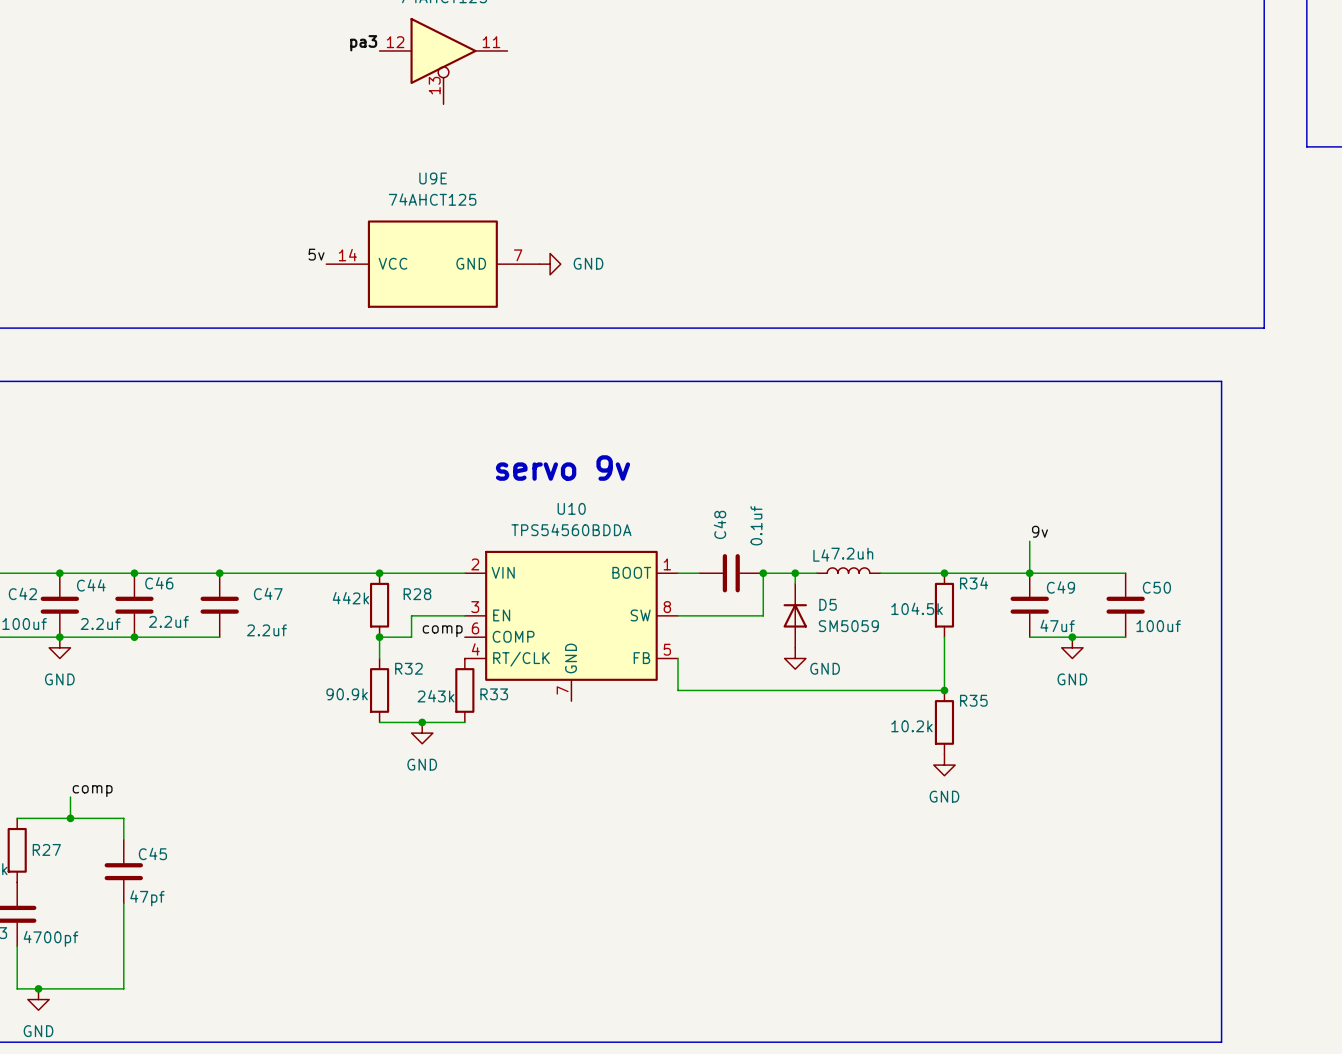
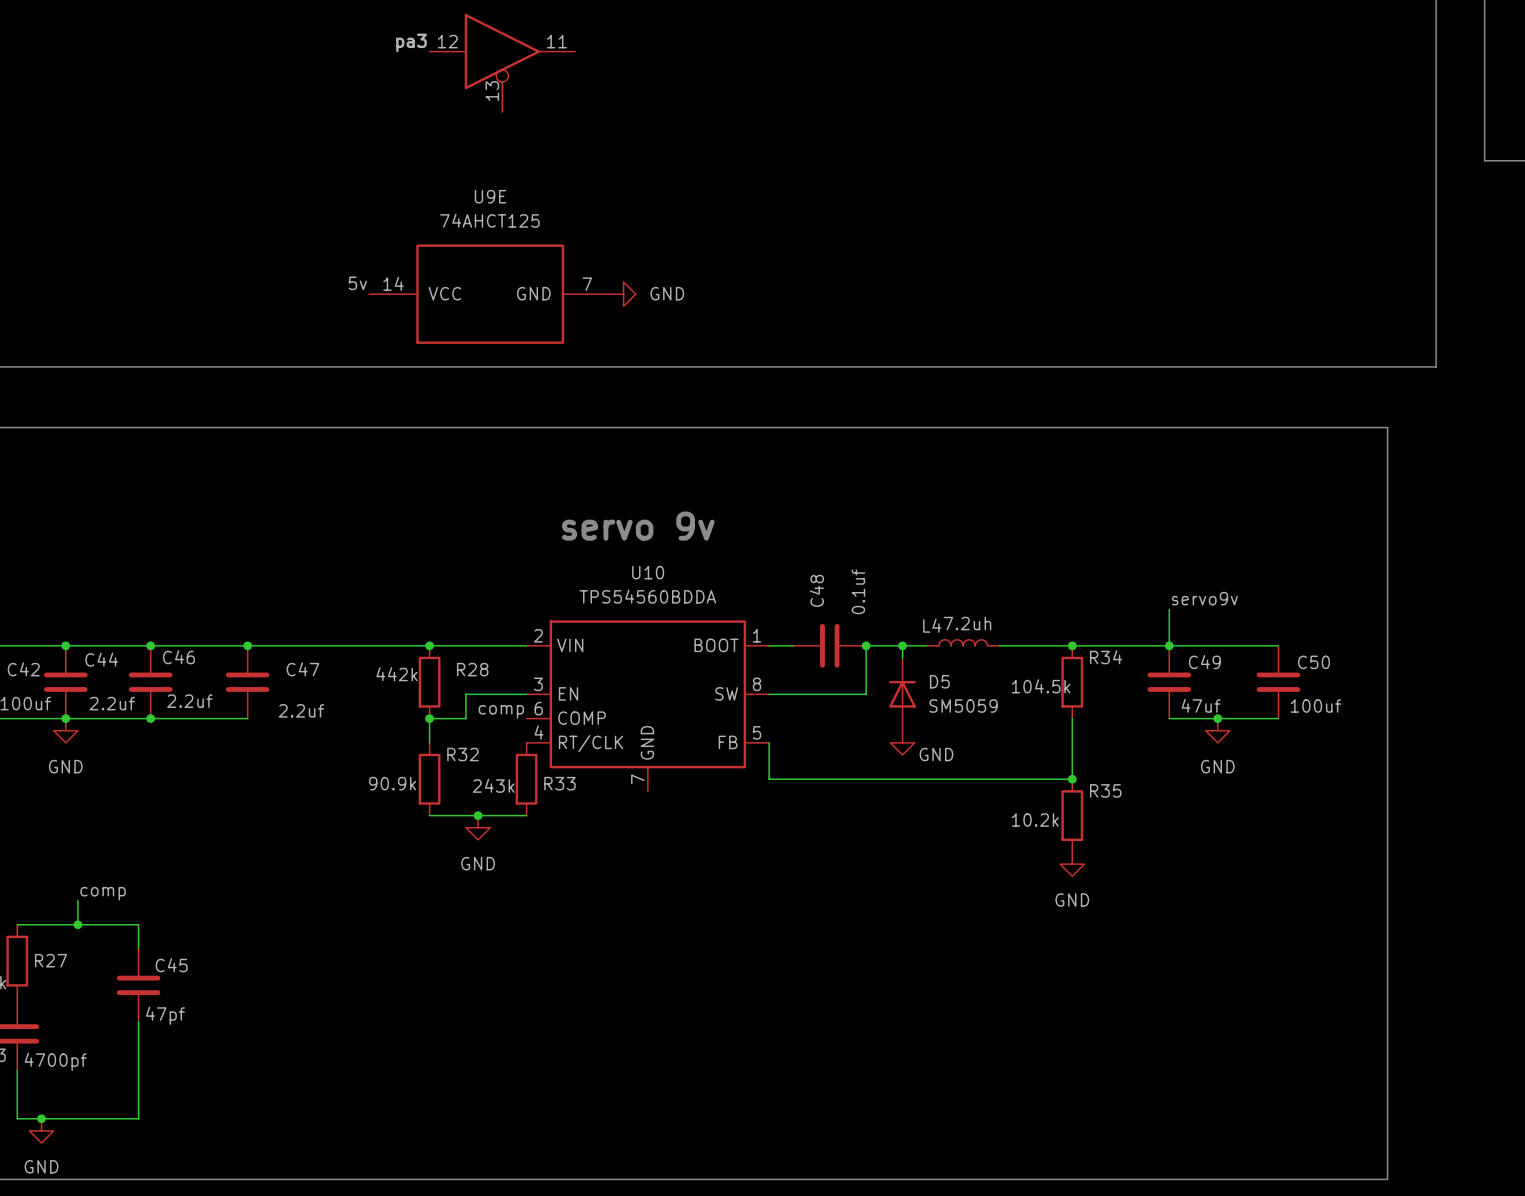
label: 9v (1039, 531) -> servo9v (1204, 598)

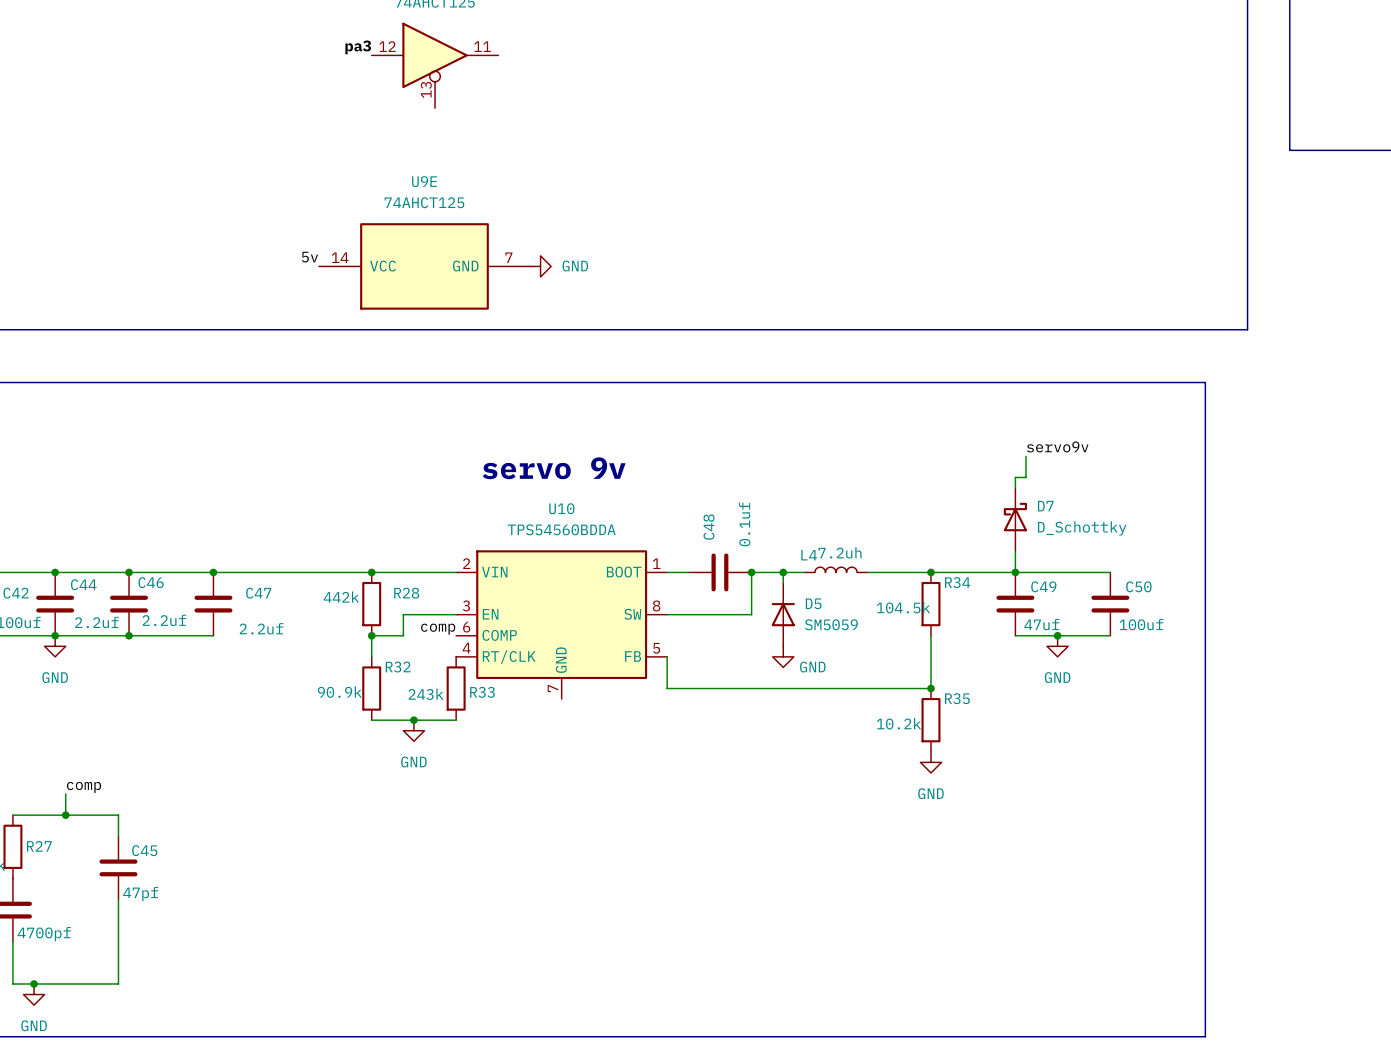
wire: none -> (1025, 456) (1025, 477) (1015, 477) (1015, 488)
D7: none -> D_Schottky (1015, 519)
label position: servo9v (1204, 598) -> servo9v (1057, 446)

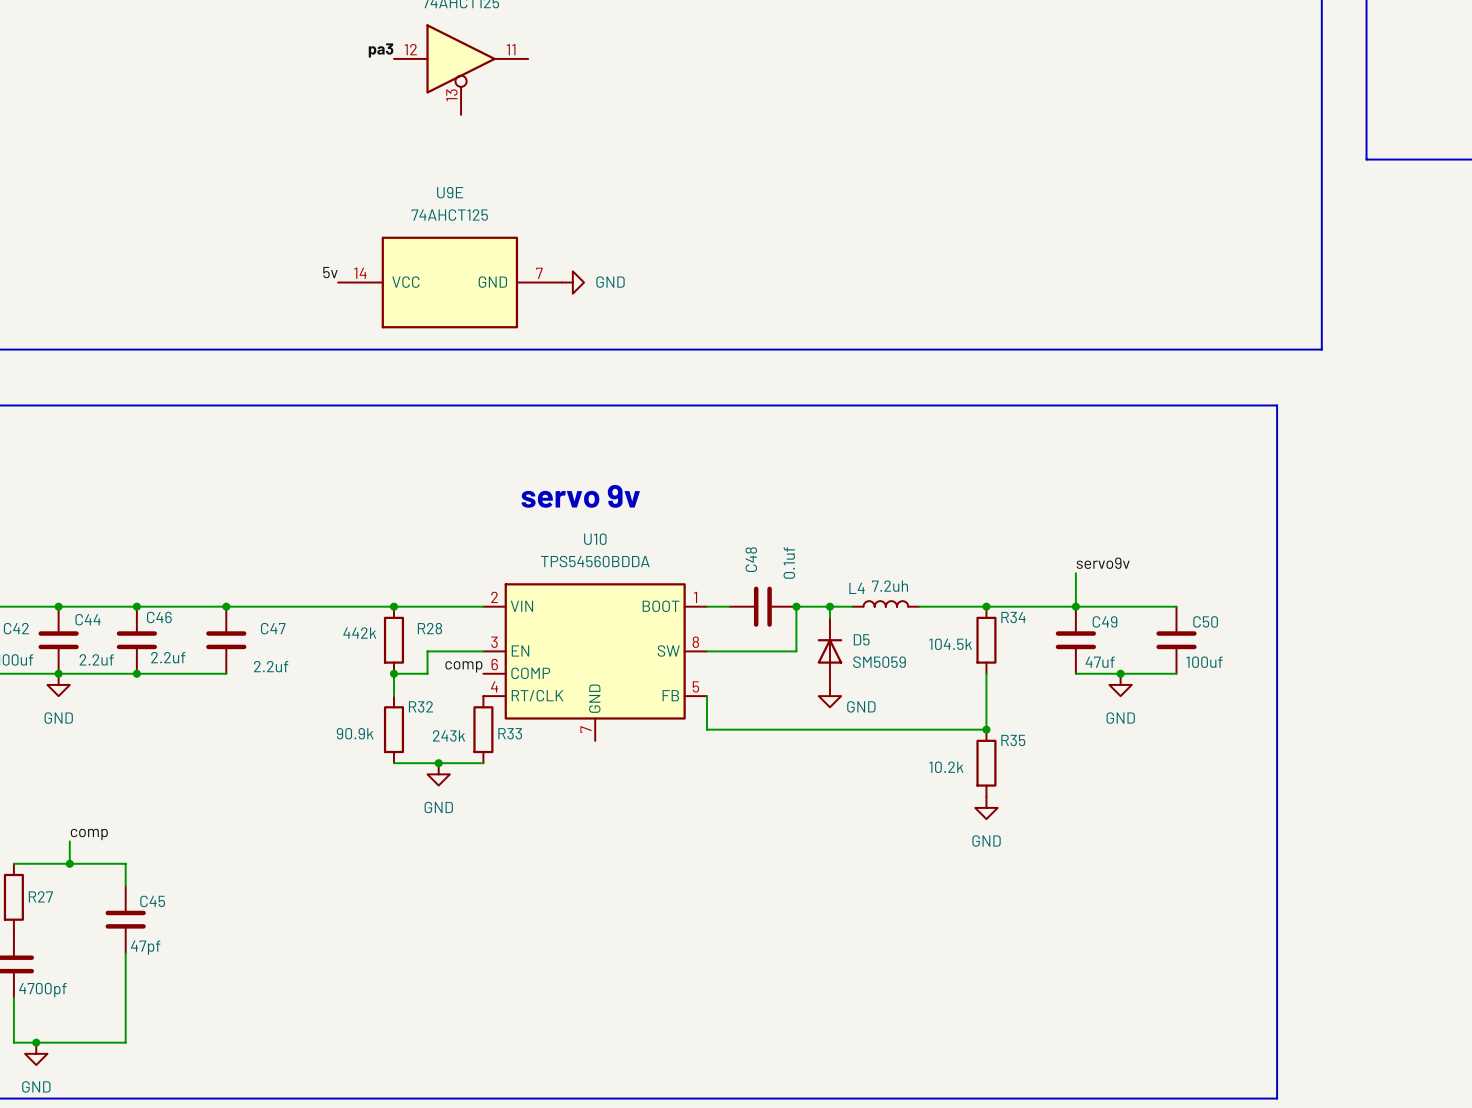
label position: servo9v (1057, 446) -> servo9v (1103, 563)
wire: (1025, 456) (1025, 477) (1015, 477) (1015, 488) -> none
D7: D_Schottky (1015, 519) -> none

